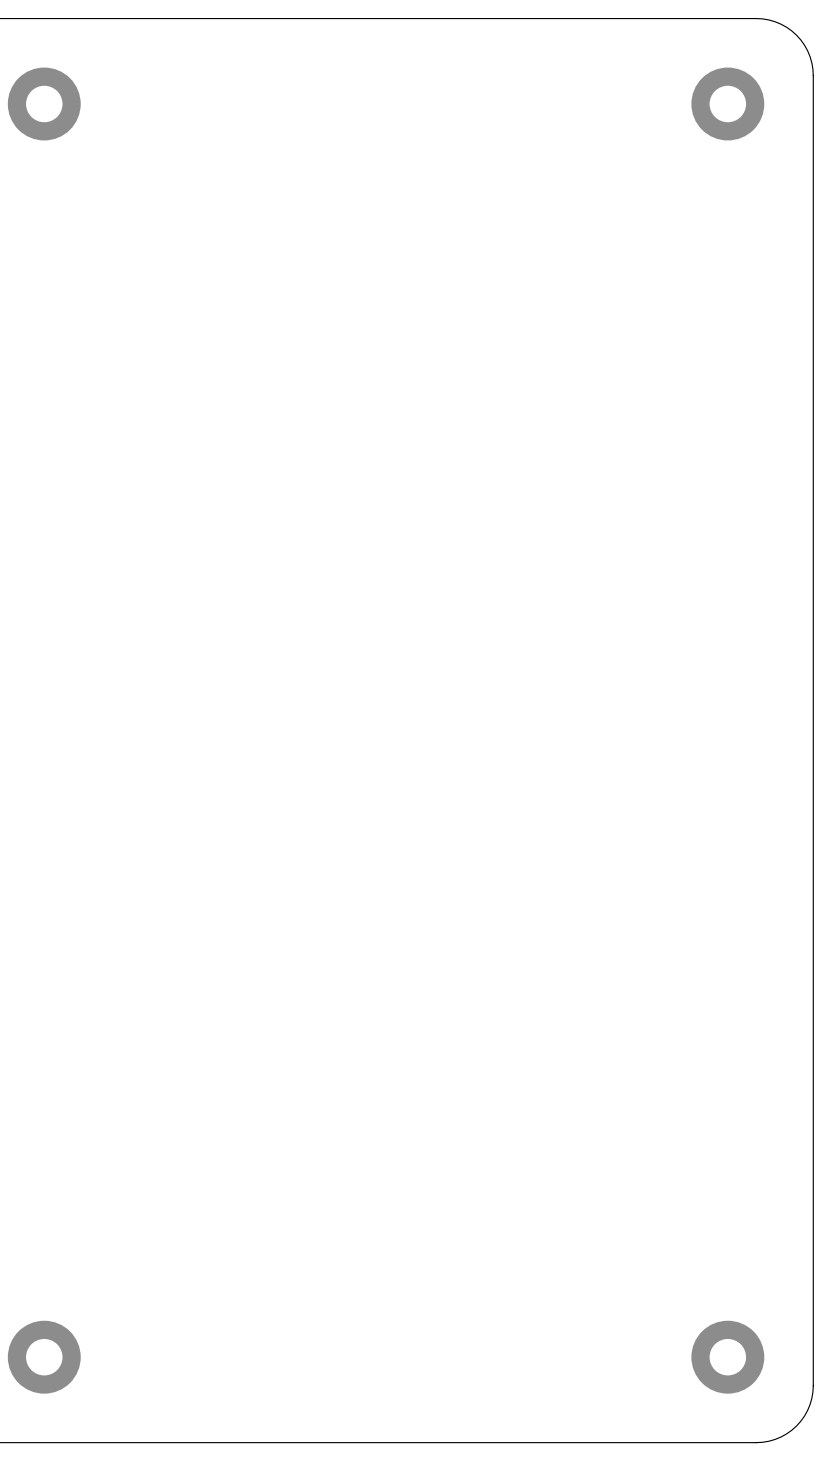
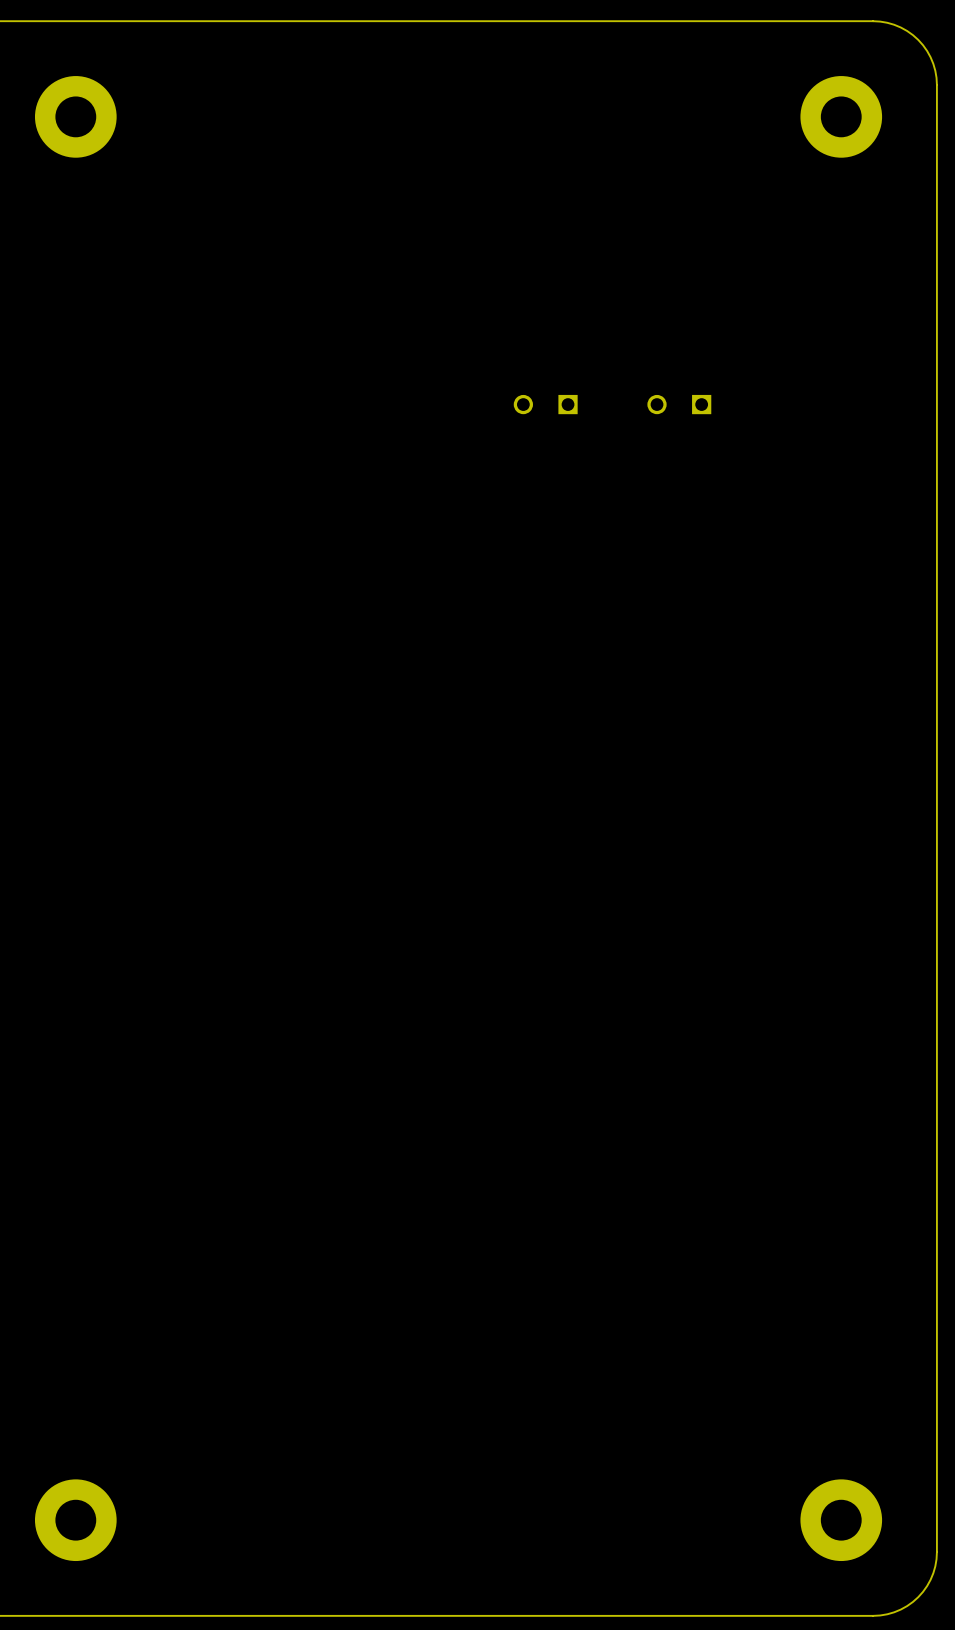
part: none -> (545, 404)
part: none -> (679, 404)

